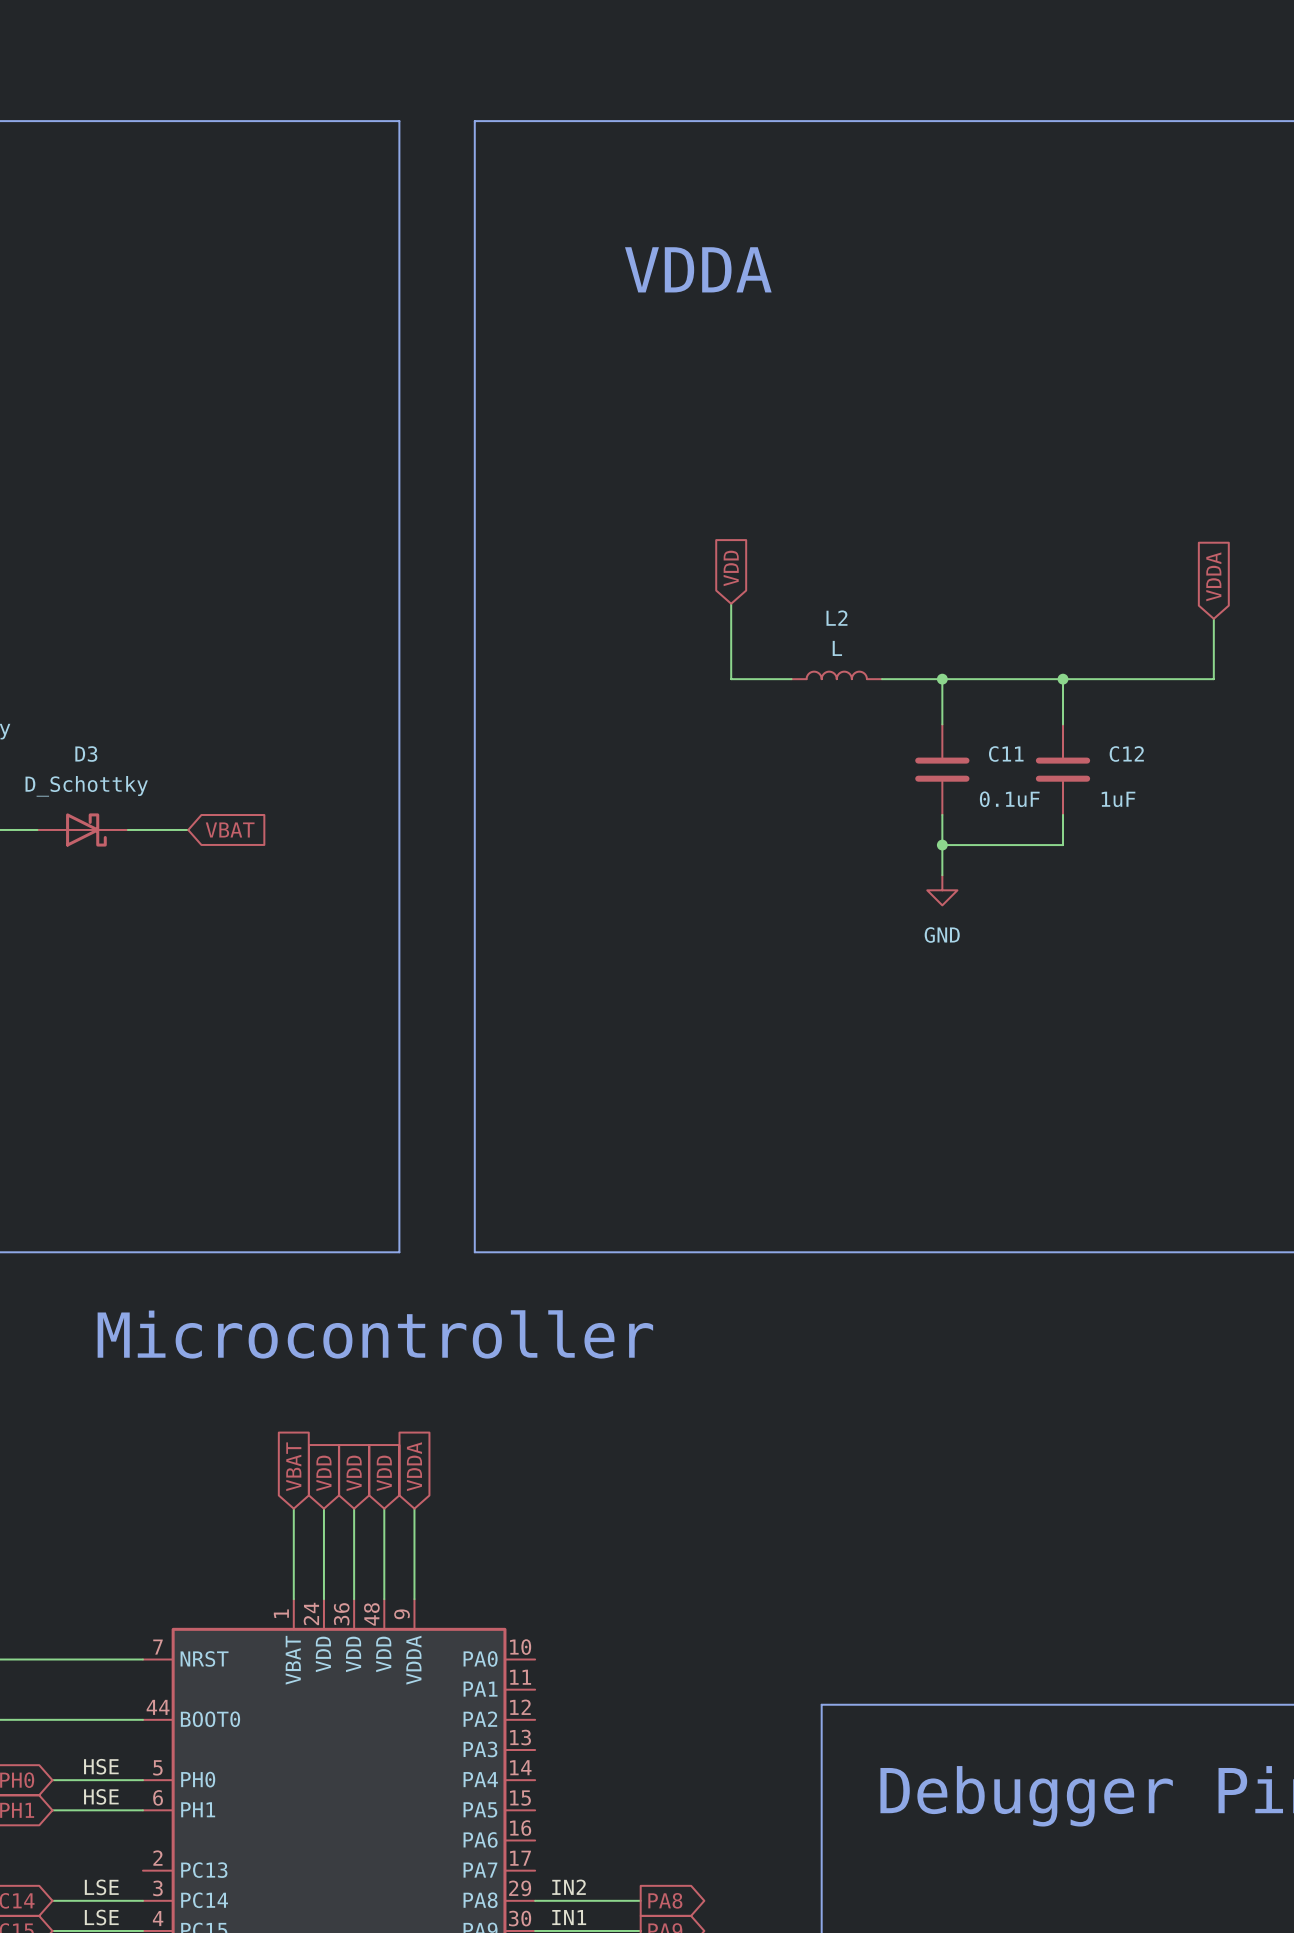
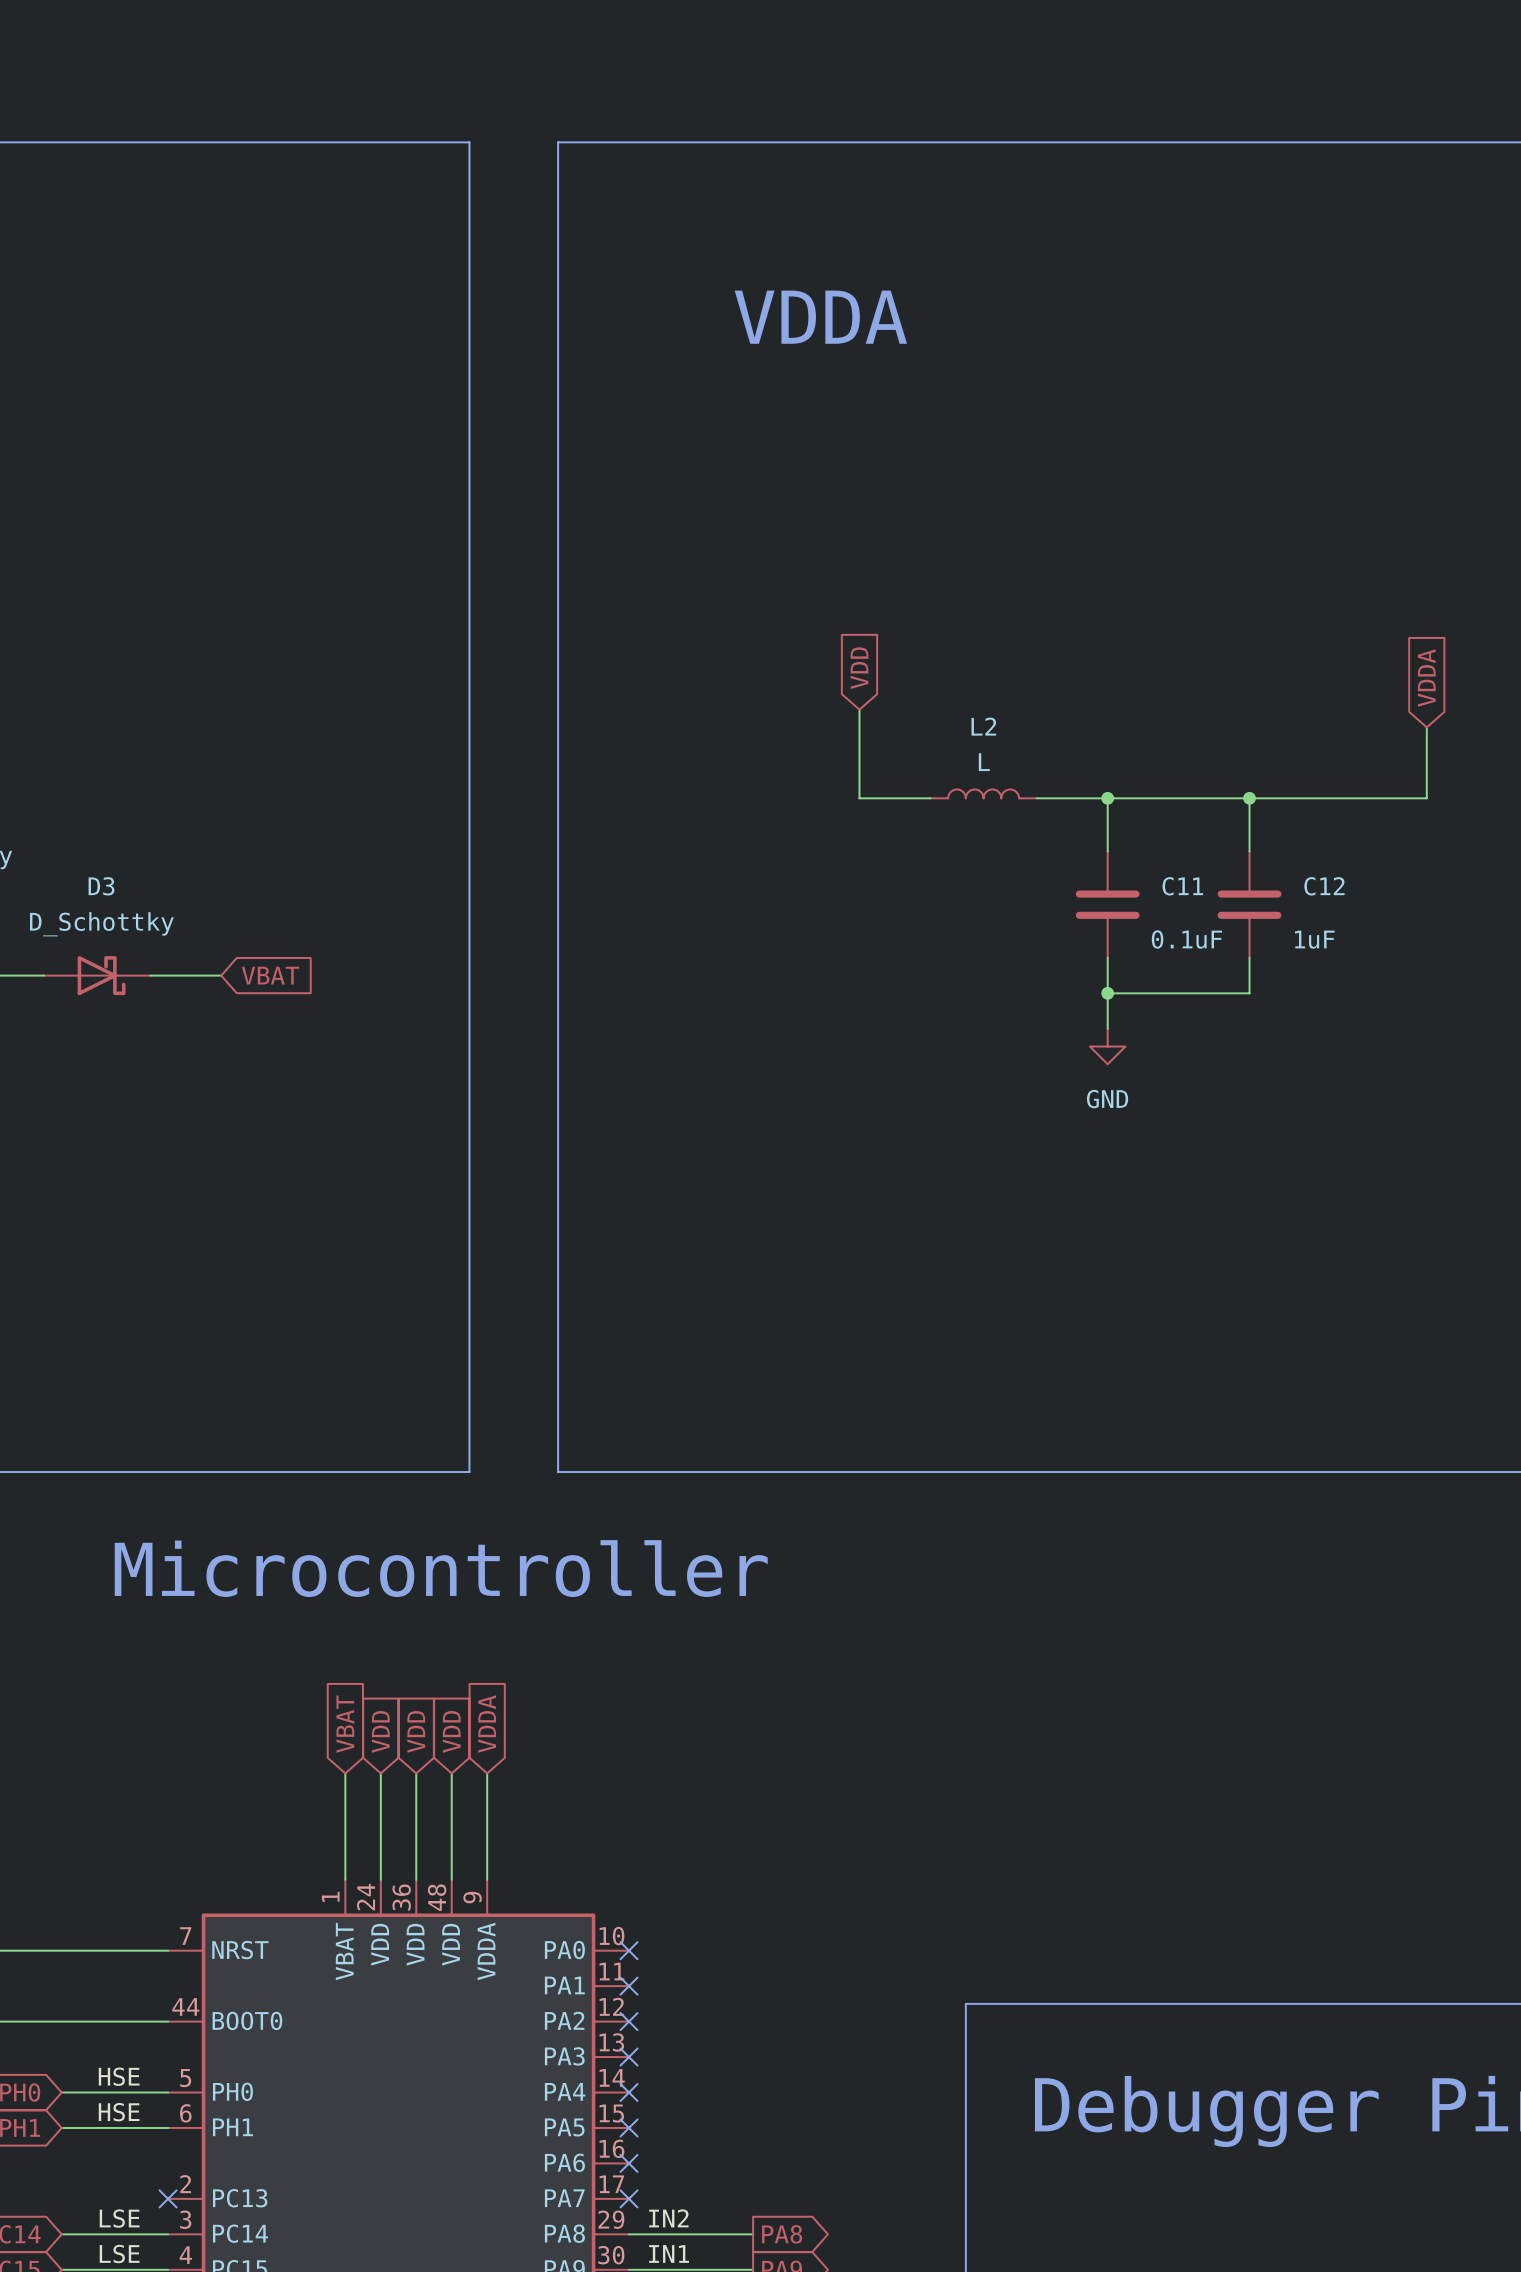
no-connect mark: none -> (629, 1950)
no-connect mark: none -> (629, 1986)
no-connect mark: none -> (629, 2021)
no-connect mark: none -> (629, 2057)
no-connect mark: none -> (629, 2092)
no-connect mark: none -> (629, 2127)
no-connect mark: none -> (629, 2163)
no-connect mark: none -> (168, 2198)
no-connect mark: none -> (629, 2198)

